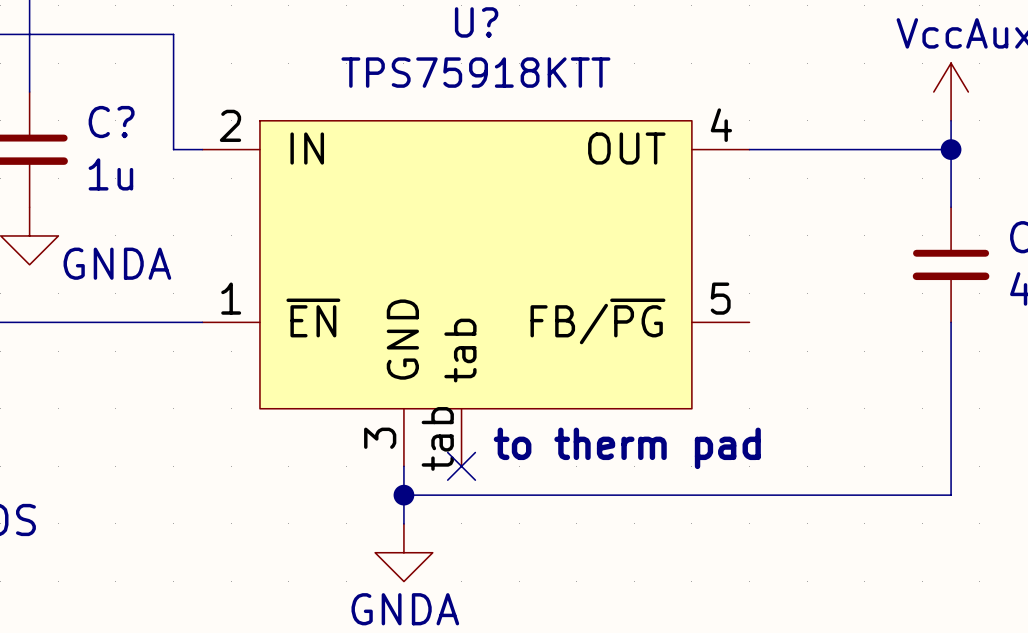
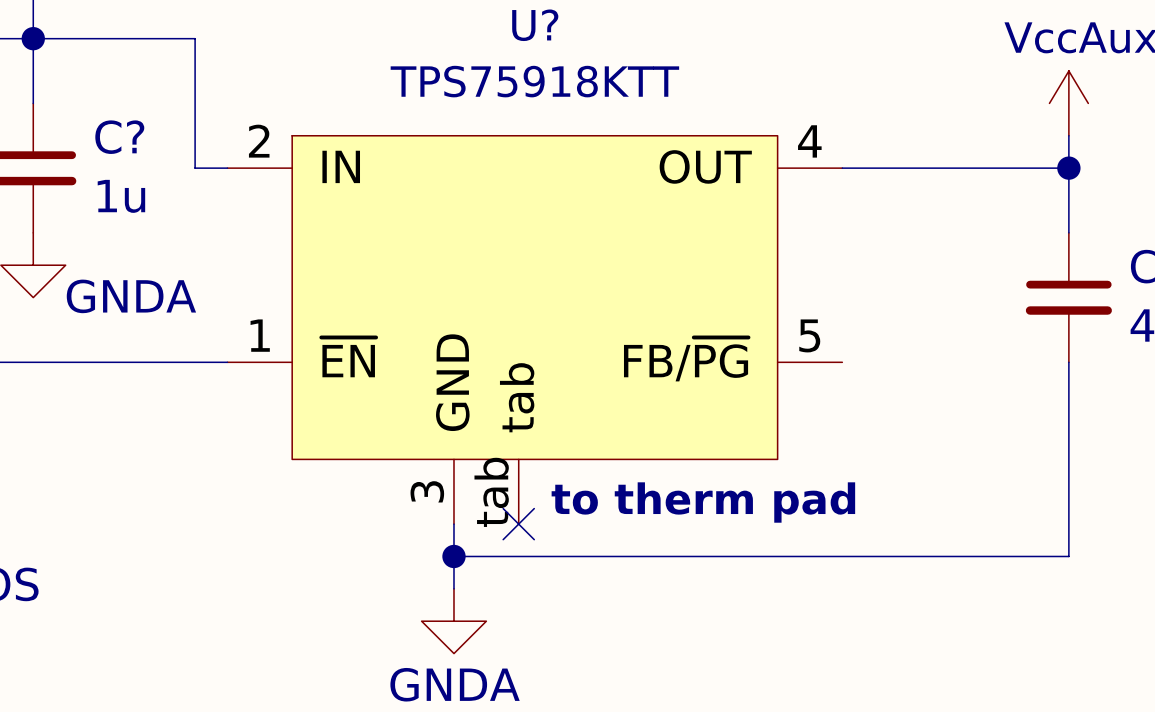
junction: none -> (33, 38)

